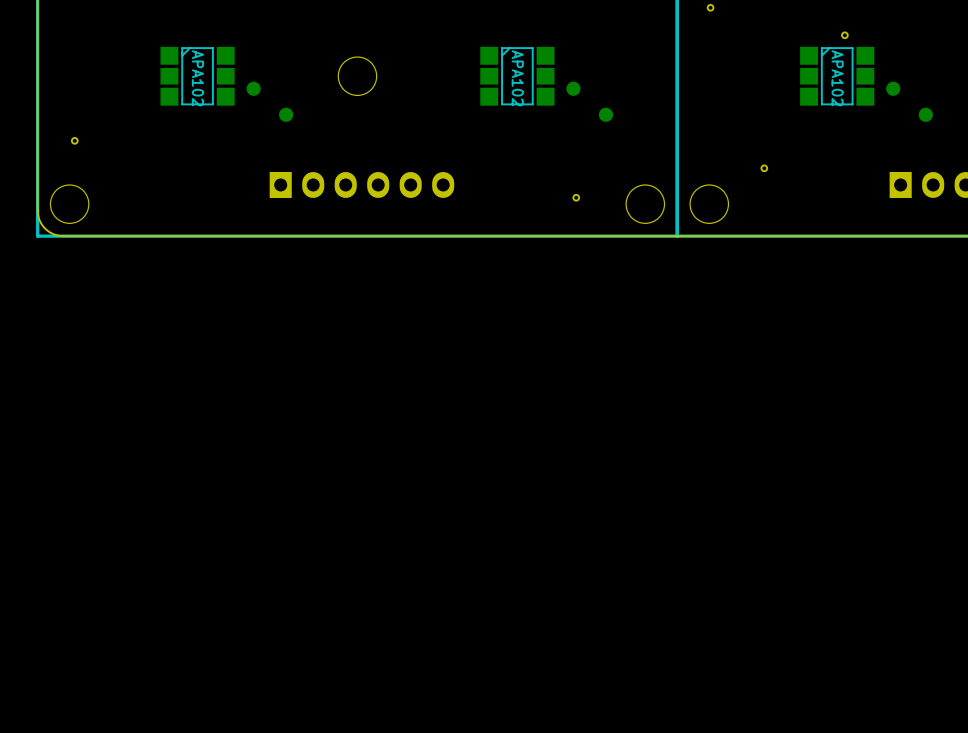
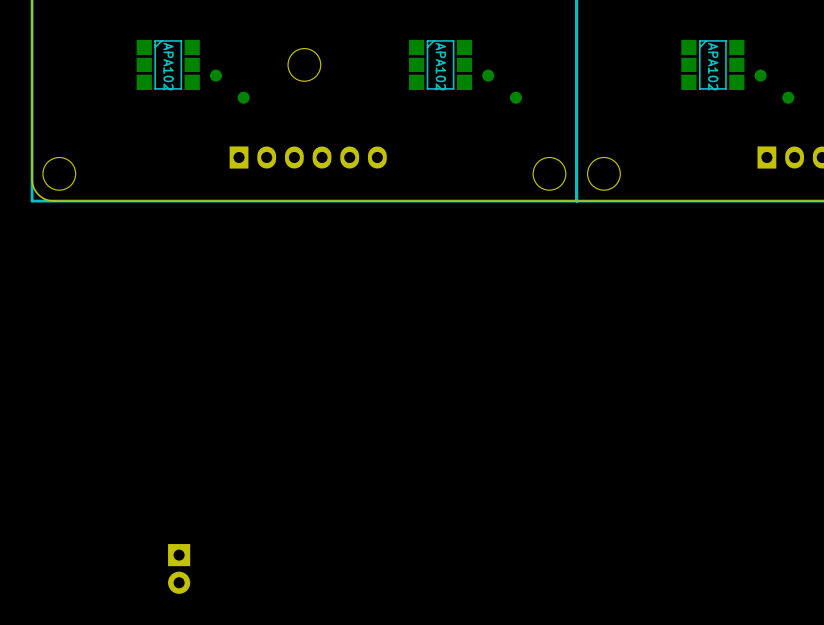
part: (710, 7) -> none
part: (844, 35) -> none
part: (74, 140) -> none
part: (764, 168) -> none
part: (576, 197) -> none
part: none -> (179, 568)

